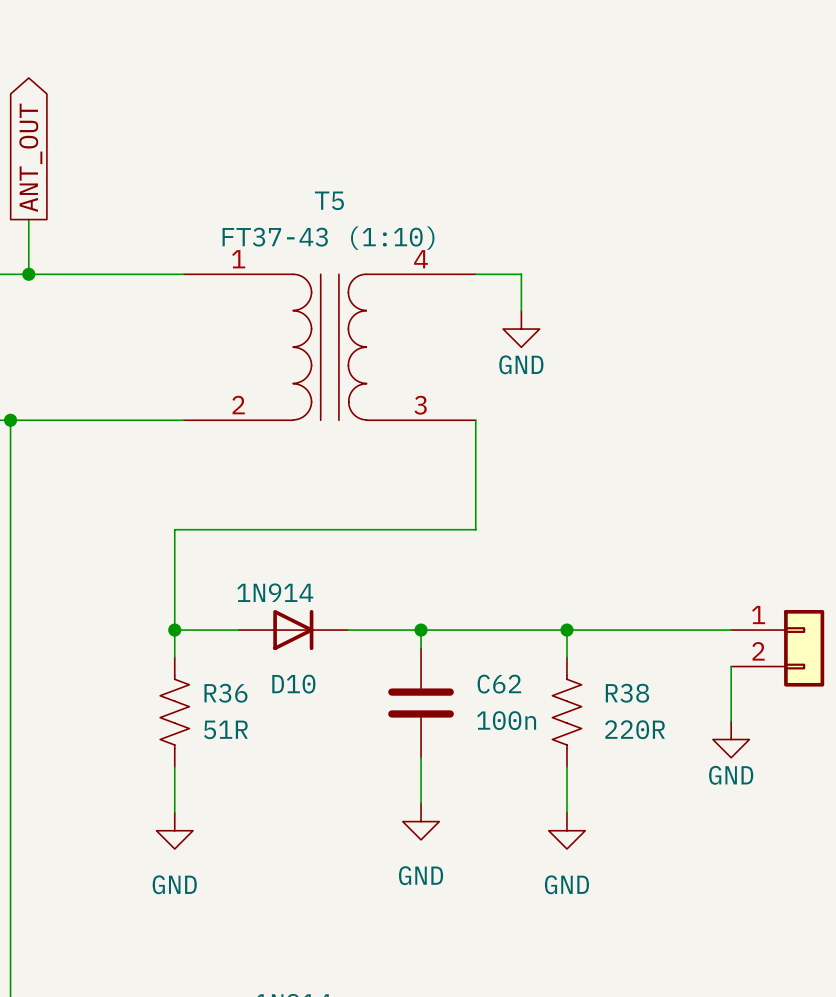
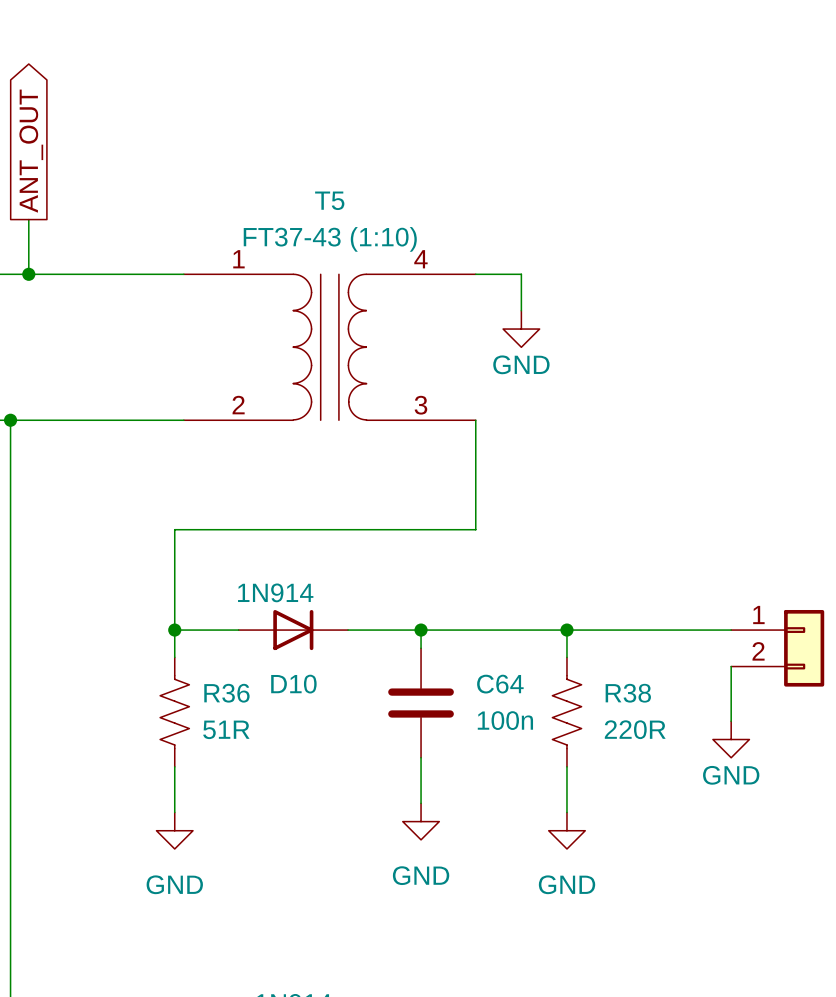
C62 name: C62 (499, 684) -> C64 (500, 684)

